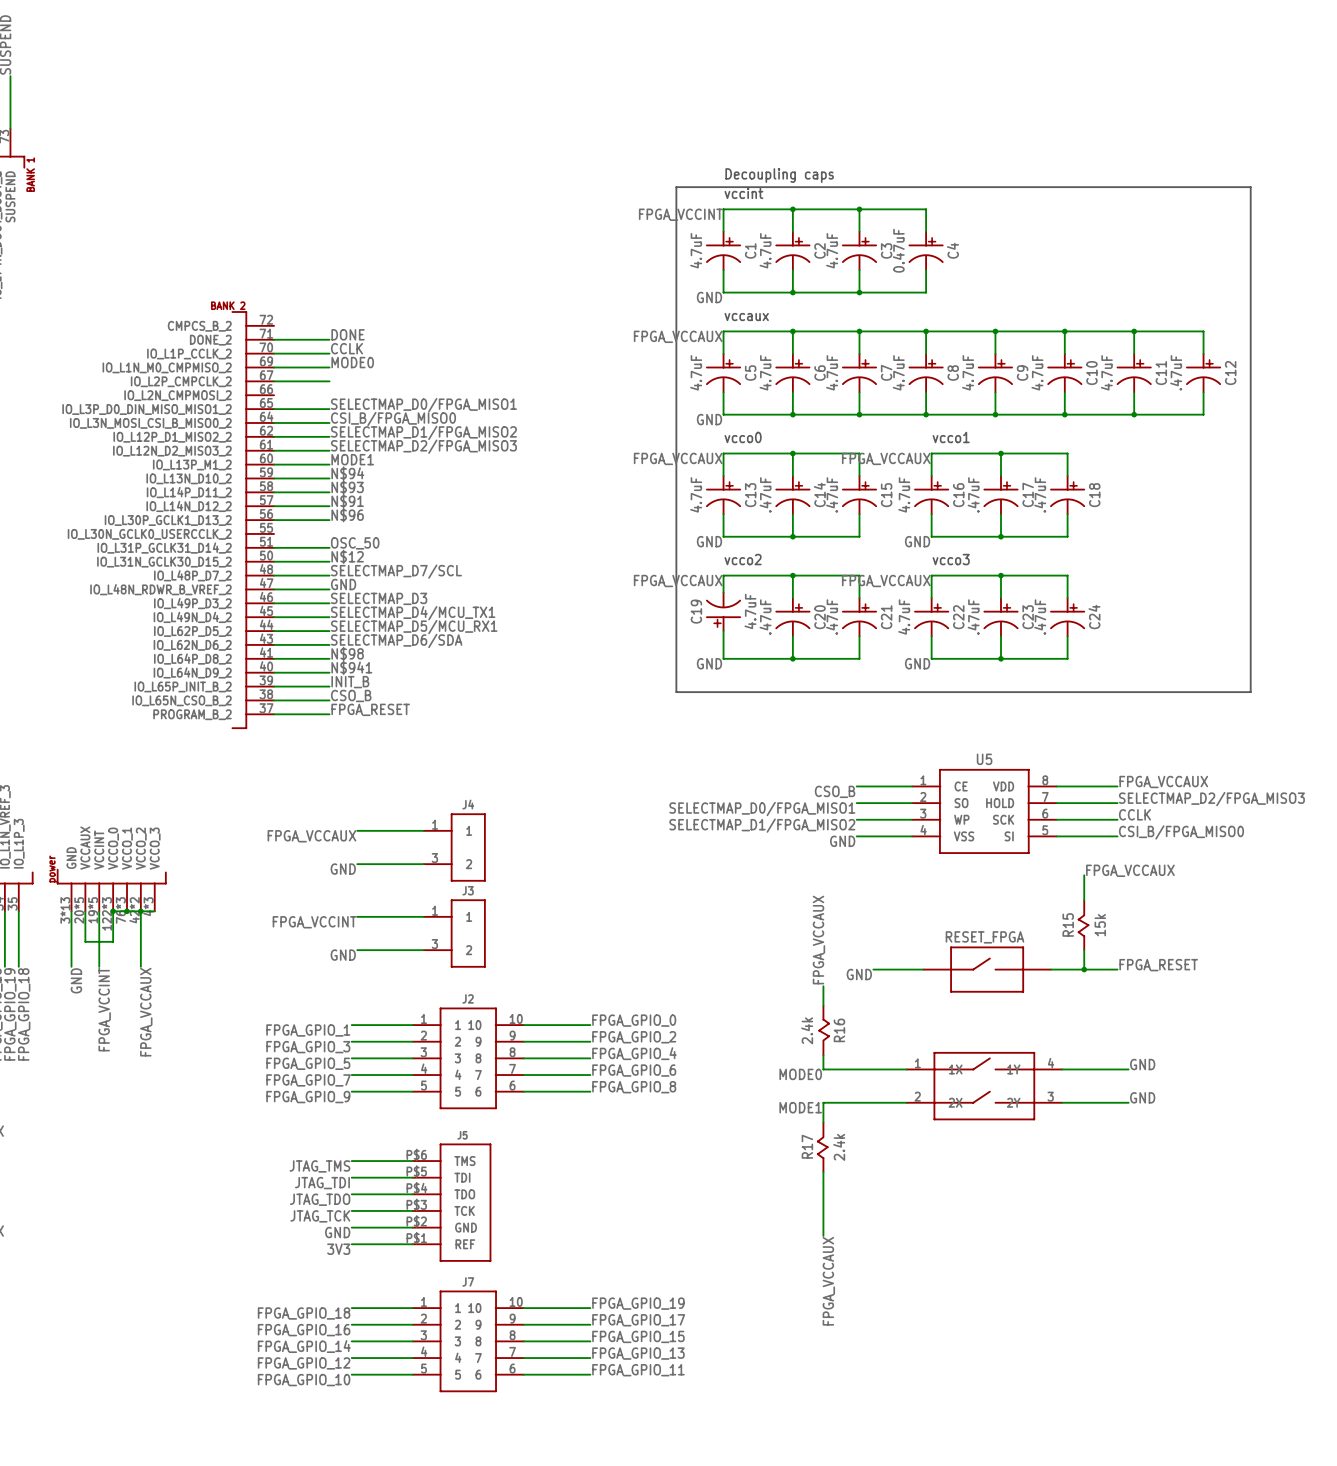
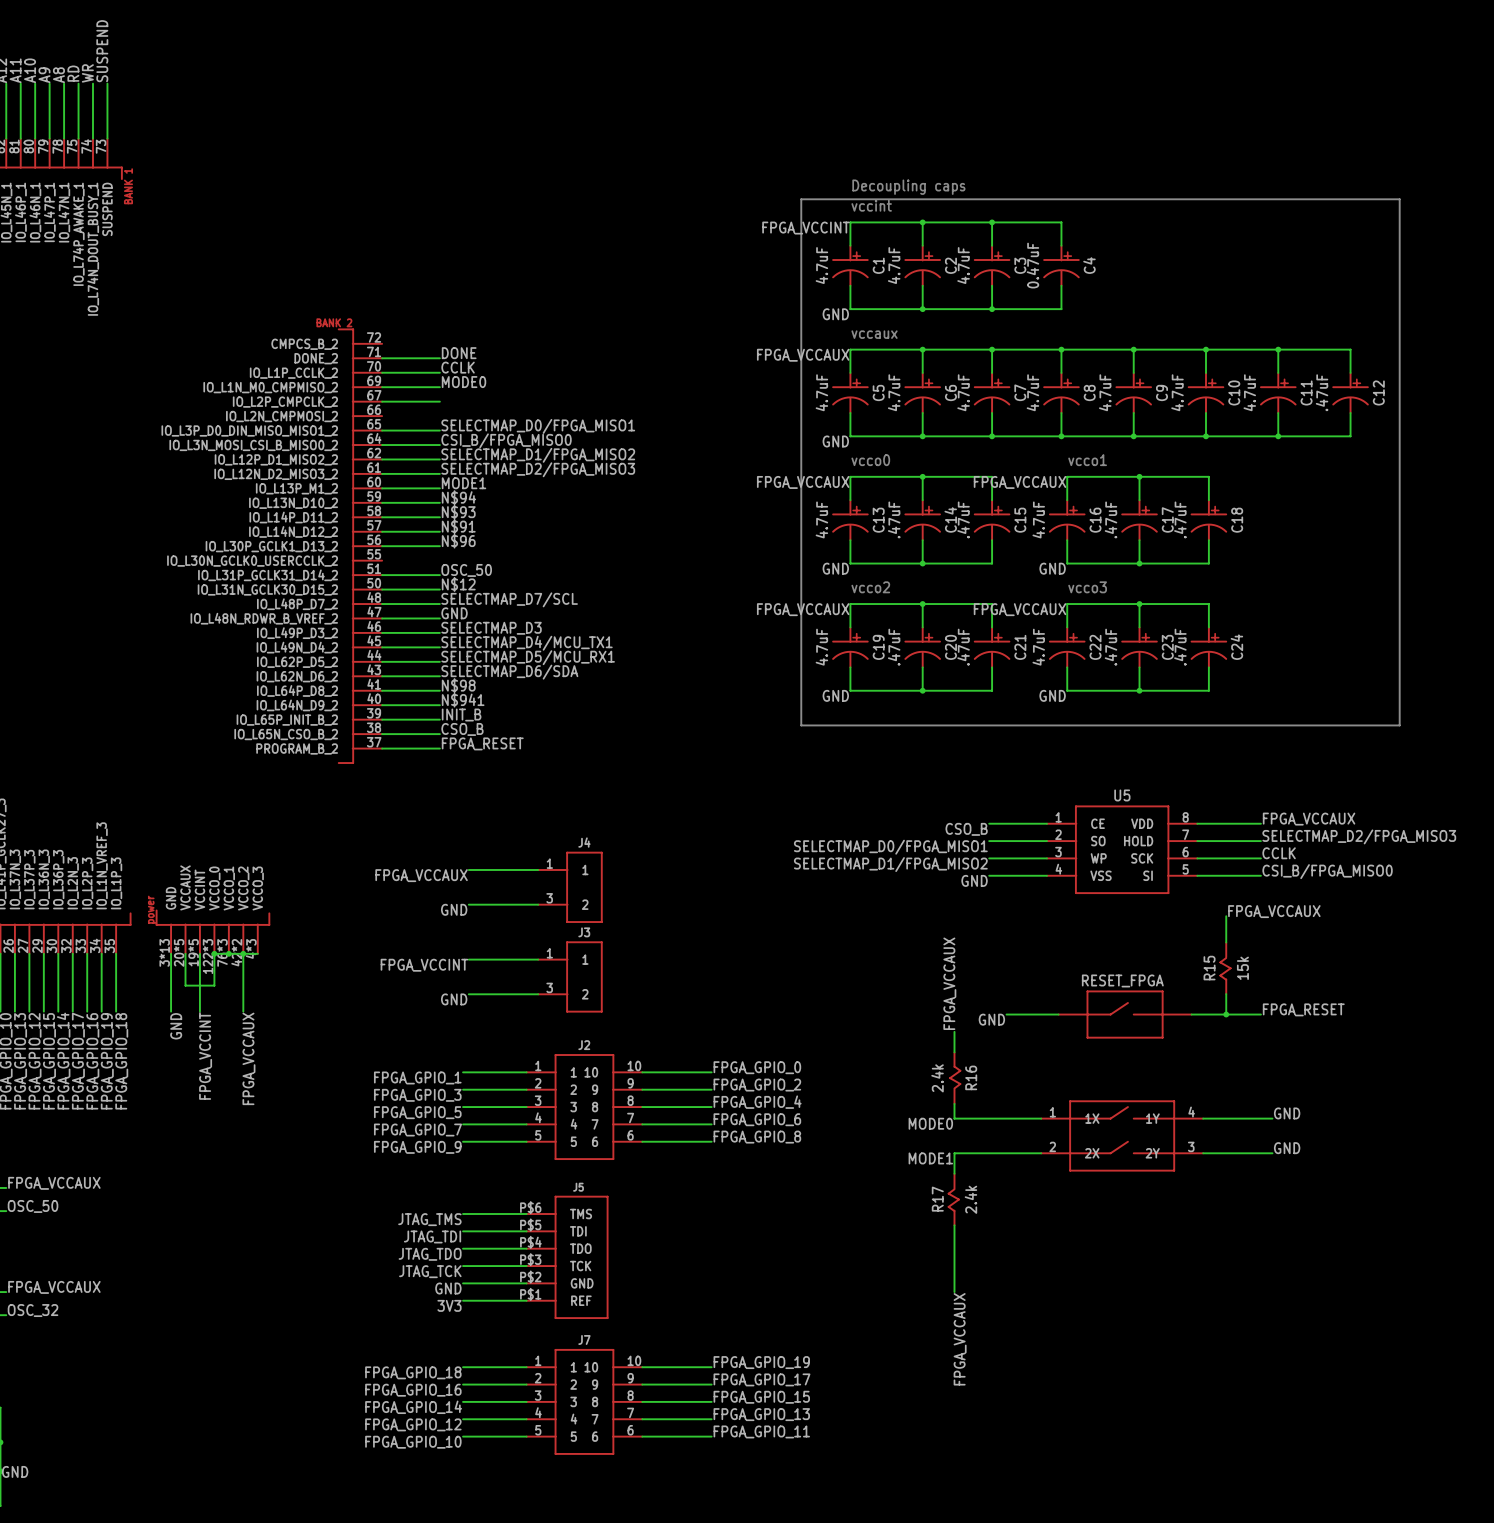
C19 symbol: [706, 592, 741, 631] -> [832, 627, 869, 668]
C19 name position: C19 (696, 611) -> C19 (878, 647)
C19 value position: 4.7uF (750, 611) -> 4.7uF (821, 647)

